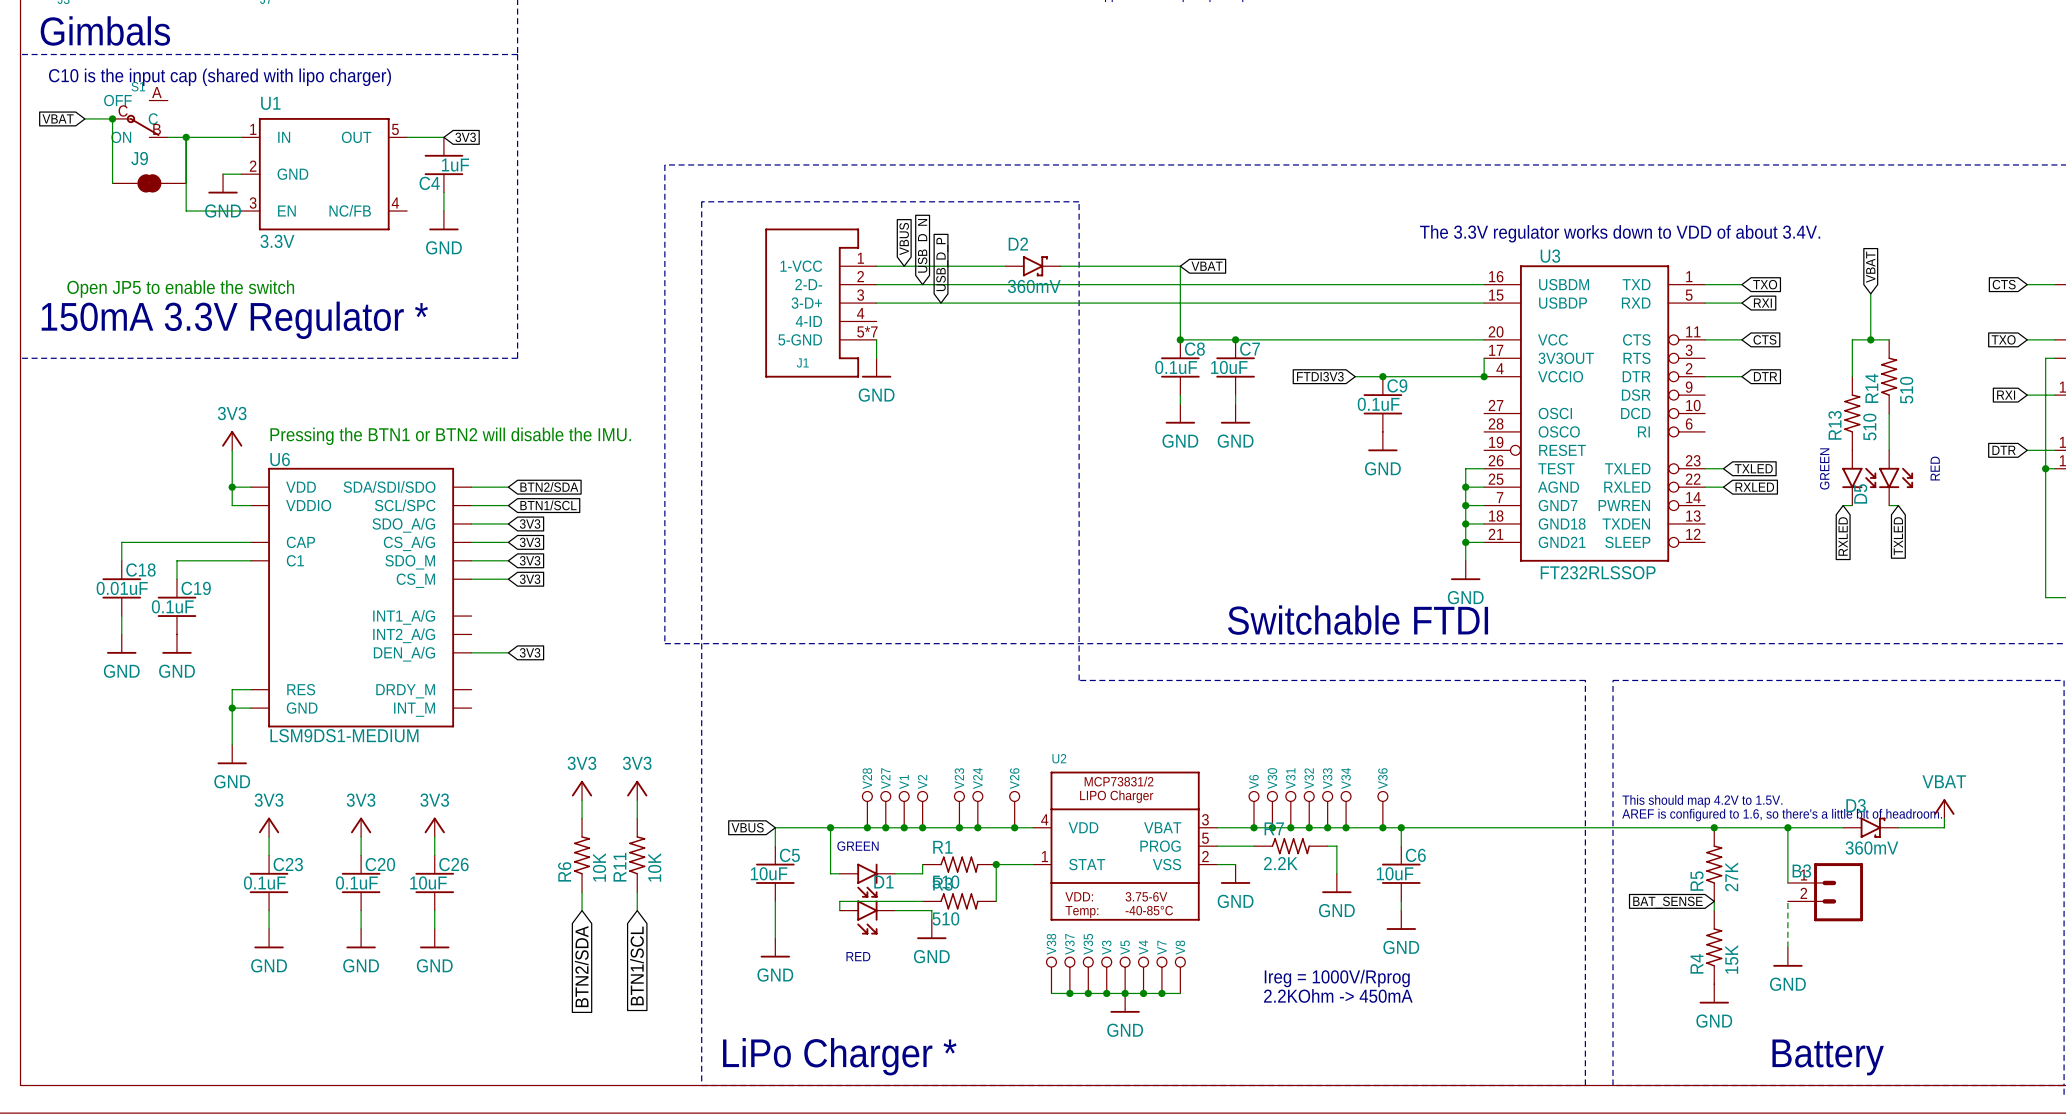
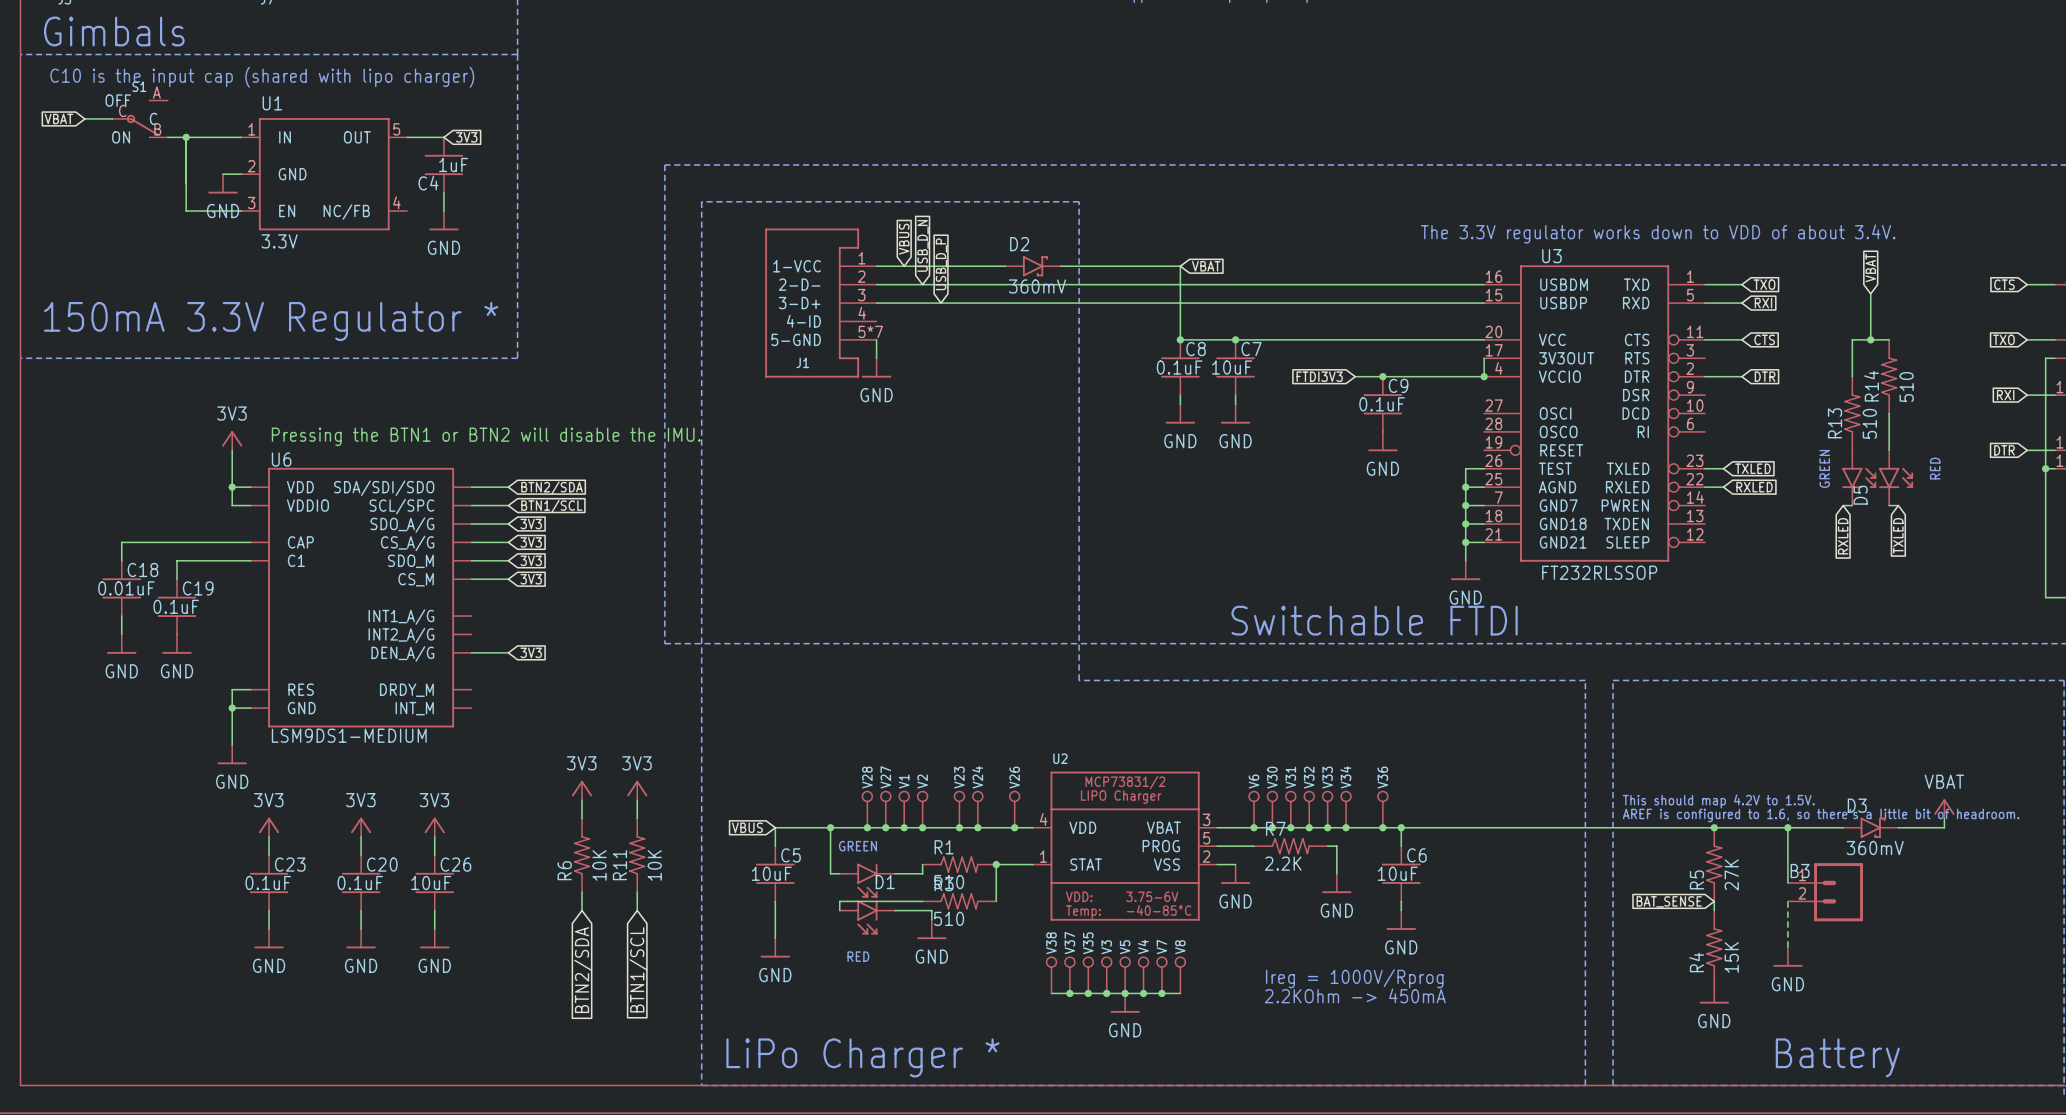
wire: (112, 118) (112, 183) -> none
junction: (112, 118) -> none
J9: (149, 183) -> none
text: Open JP5 to enable the switch (180, 289) -> none

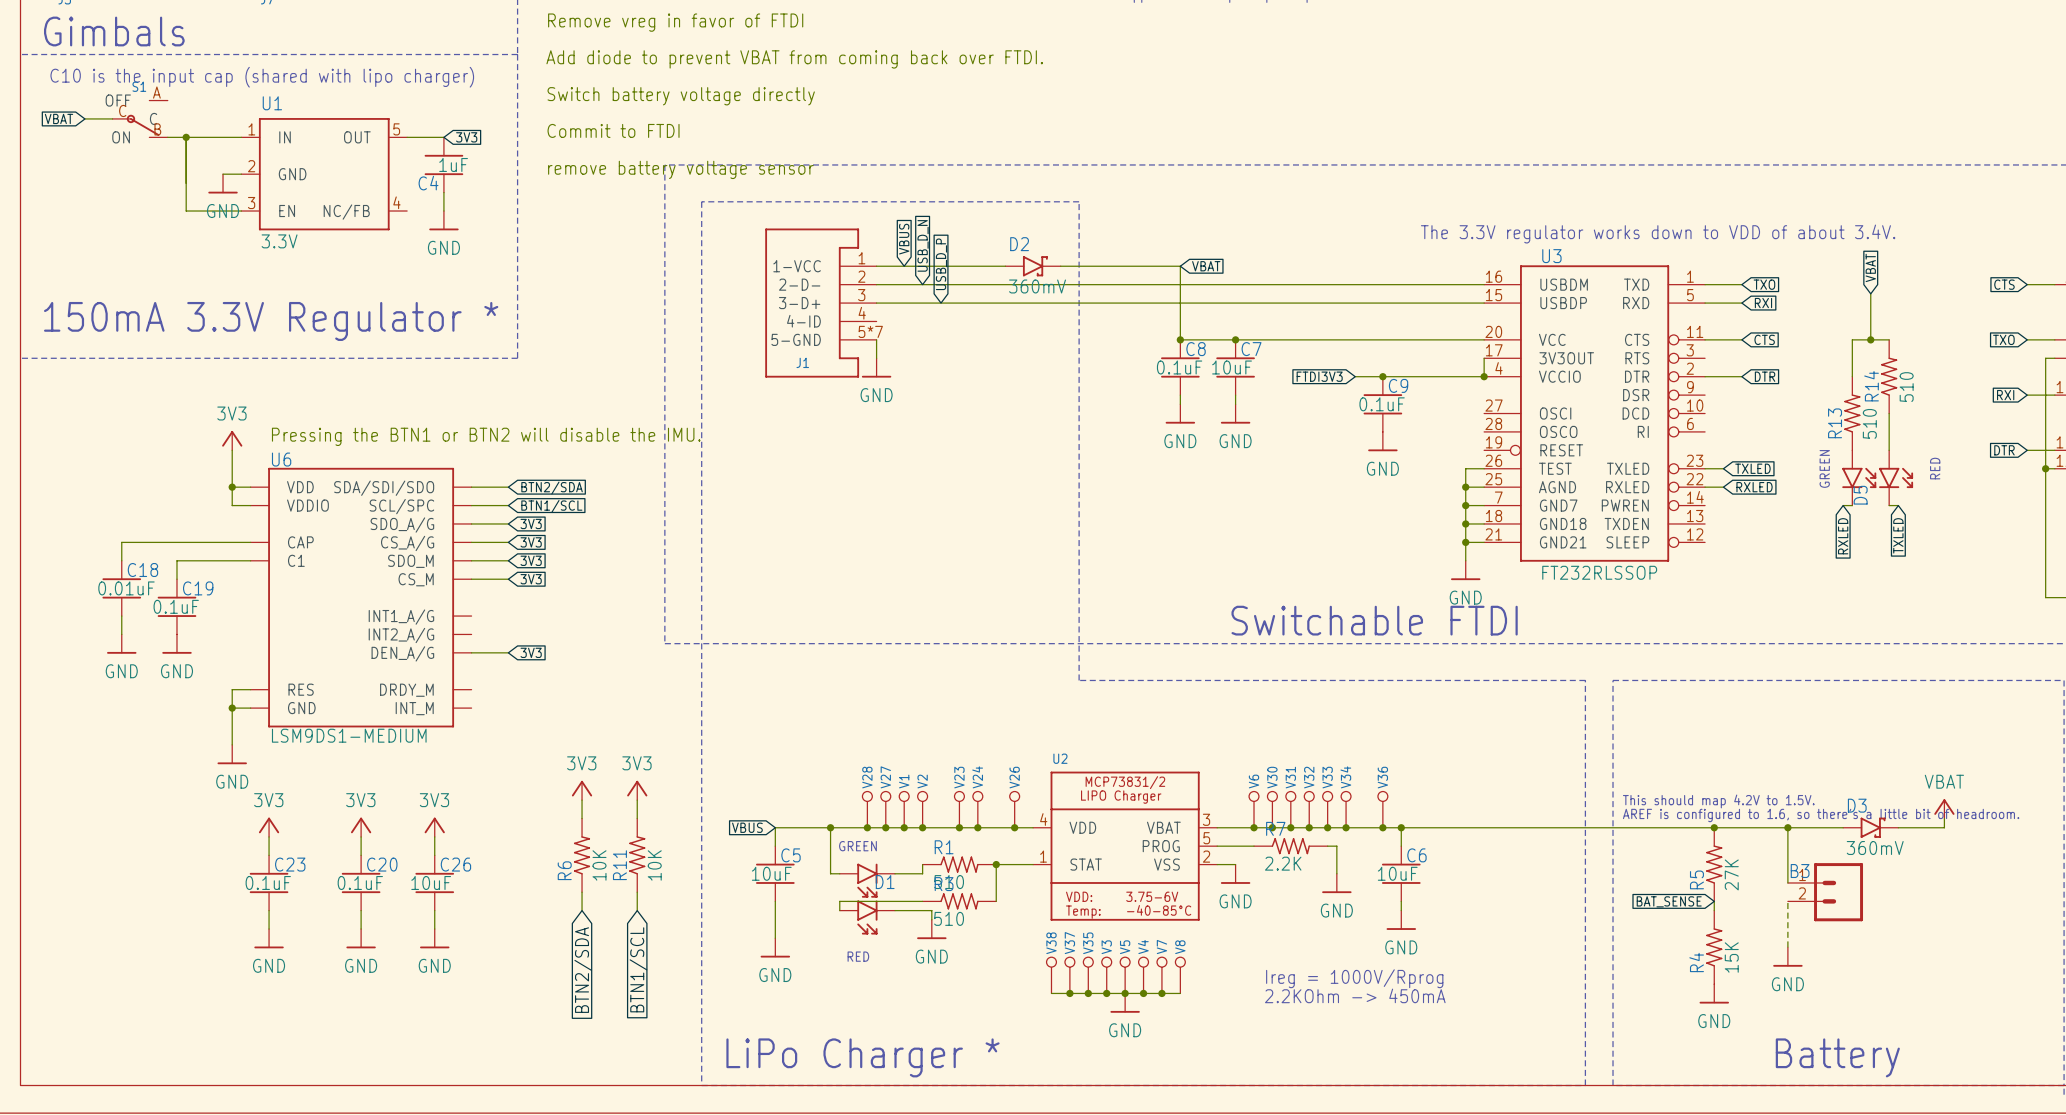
text: none -> Remove vreg in favor of FTDI (675, 22)
text: none -> Add diode to prevent VBAT from coming back over FTDI. (794, 59)
text: none -> Switch battery voltage directly (681, 96)
text: none -> Commit to FTDI (613, 130)
text: none -> remove battery voltage sensor (680, 169)

